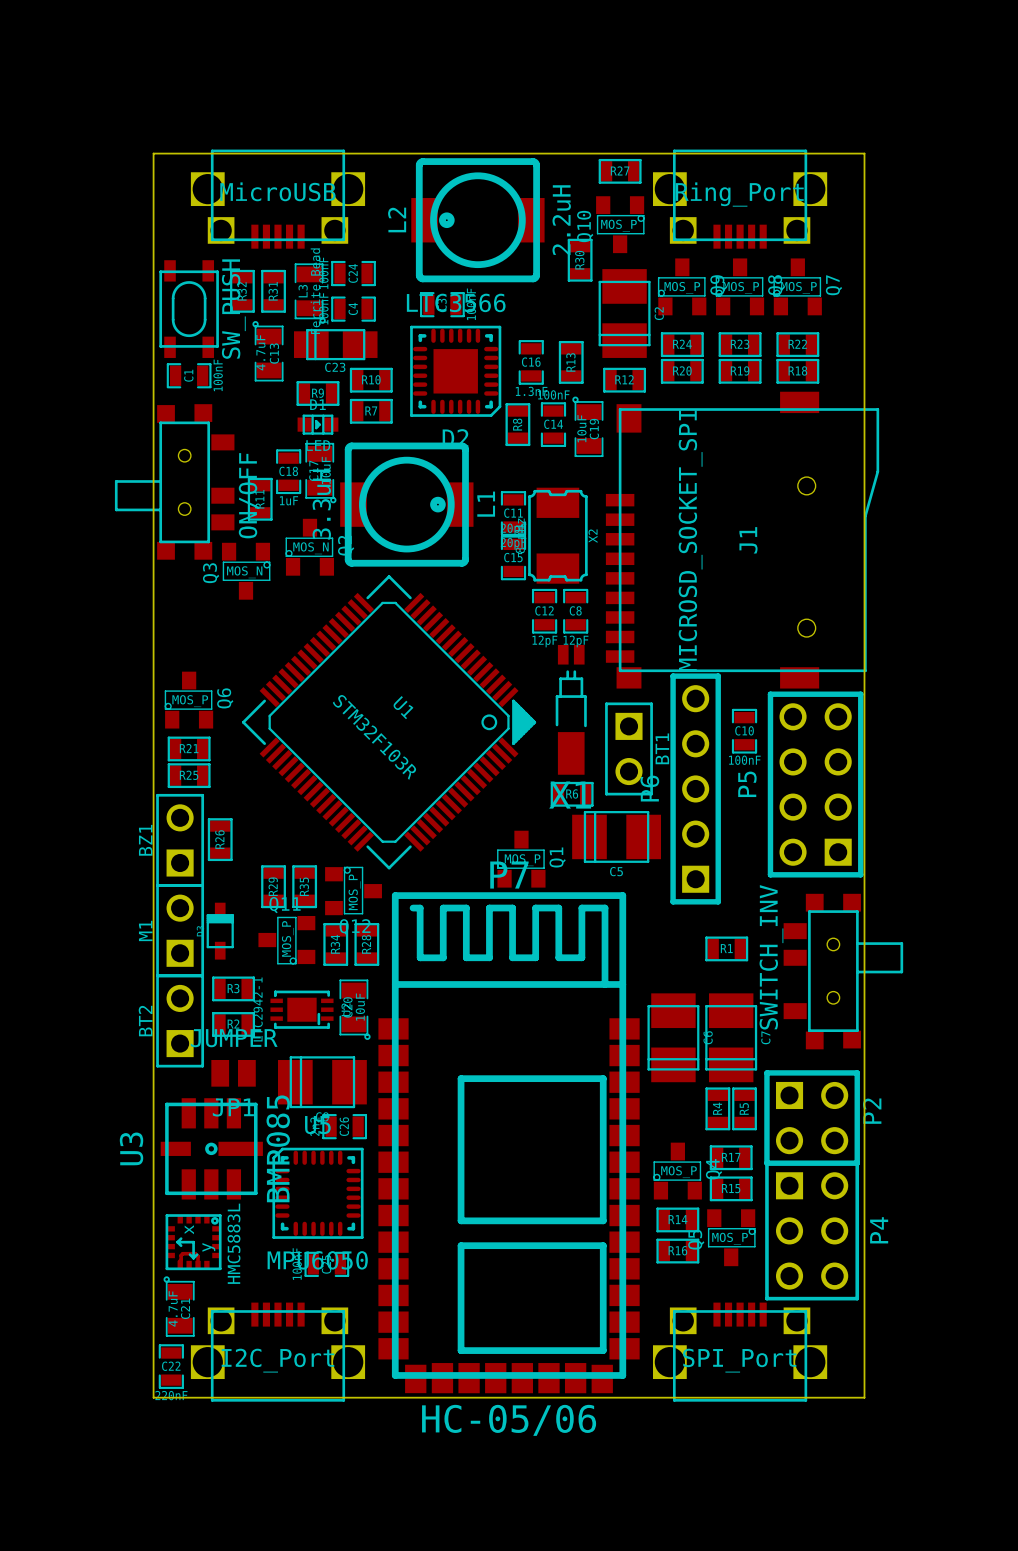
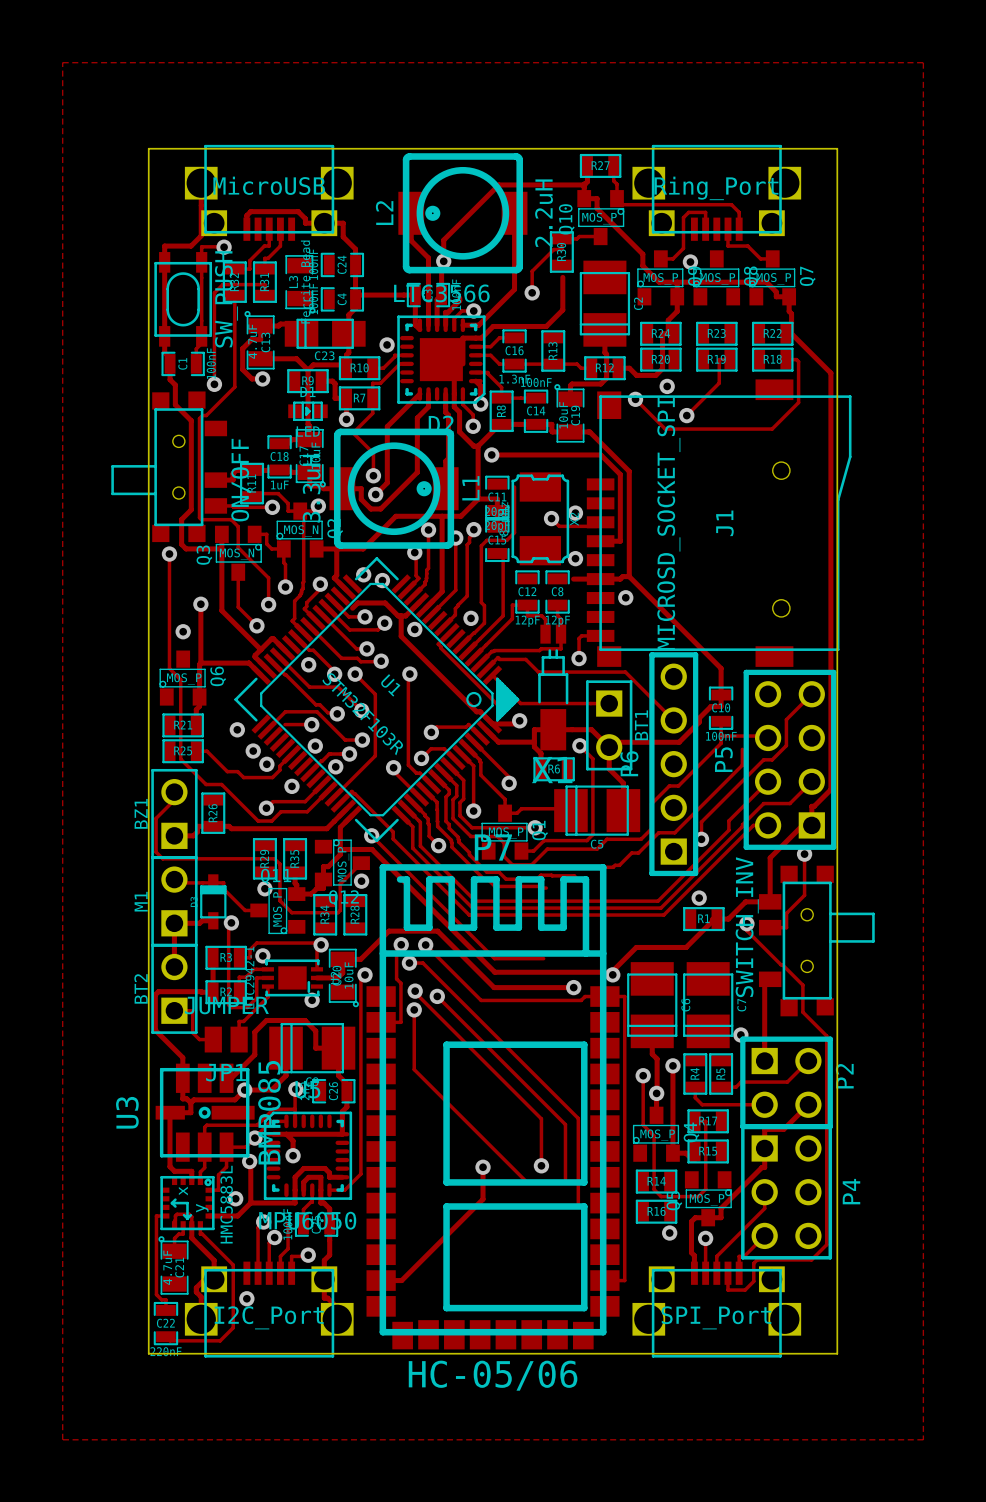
zone outline: none -> (62, 62) (923, 62) (923, 1439) (62, 1439) (62, 62)
track: none -> (587, 165) (587, 181) (584, 184) (584, 198) (597, 198) (597, 208) (642, 254) (642, 265) (659, 282) (766, 282) (776, 291) (776, 296) (789, 296) (791, 333)
track: none -> (613, 165) (617, 198) (623, 204) (731, 204) (739, 212) (739, 229)
track: none -> (201, 183) (201, 235) (191, 246) (164, 246) (164, 352) (170, 358) (170, 379) (175, 385) (175, 404) (191, 420) (191, 509) (181, 519) (181, 544) (186, 548) (221, 548)
track: none -> (584, 184) (498, 184) (443, 240) (441, 295) (437, 299) (437, 325)
track: none -> (411, 213) (411, 240) (428, 258) (428, 325)
track: none -> (514, 213) (514, 289) (478, 325) (462, 325)
track: none -> (246, 229) (246, 215) (250, 211) (298, 211) (305, 218) (305, 223) (343, 223) (343, 236) (355, 249) (355, 308) (348, 314) (348, 352) (346, 355) (346, 368)
track: none -> (269, 229) (269, 246) (264, 246) (249, 260) (249, 269) (234, 269)
track: none -> (280, 229) (280, 246) (268, 258) (264, 258) (264, 269)
track: none -> (705, 229) (705, 212) (688, 212) (683, 217) (683, 248) (672, 258) (660, 258)
track: none -> (727, 229) (727, 246) (747, 246) (760, 258) (772, 258)
track: none -> (600, 236) (561, 238) (561, 249) (553, 249) (532, 271) (532, 292)
track: none -> (224, 247) (201, 246) (201, 343) (196, 348) (196, 363)
via: none -> (224, 247)
via: none -> (443, 261)
via: none -> (690, 262)
track: none -> (562, 277) (562, 309) (546, 326) (493, 326) (481, 338) (462, 338) (462, 363)
track: none -> (677, 282) (677, 311) (668, 320) (668, 333)
via: none -> (532, 292)
track: none -> (234, 295) (234, 387) (206, 415) (202, 415) (199, 418) (199, 517) (201, 519) (231, 519) (238, 526) (238, 547) (268, 578) (268, 604)
track: none -> (264, 295) (264, 284) (222, 284) (214, 292) (214, 384)
track: none -> (355, 295) (415, 295) (415, 325) (419, 329)
track: none -> (459, 298) (459, 300) (448, 312) (445, 312) (445, 325)
track: none -> (473, 310) (462, 310) (454, 318) (454, 325)
via: none -> (473, 310)
track: none -> (604, 329) (606, 378) (600, 384) (572, 384) (570, 399)
track: none -> (301, 333) (301, 326) (299, 324) (260, 326) (260, 339) (251, 339) (242, 348) (242, 369) (252, 378) (262, 378)
track: none -> (673, 333) (662, 333) (662, 368) (655, 375) (636, 375) (629, 368) (606, 368)
track: none -> (791, 333) (830, 373) (830, 789) (814, 806) (811, 806) (811, 825)
track: none -> (514, 337) (499, 337) (490, 346) (475, 346)
via: none -> (387, 344)
track: none -> (406, 355) (394, 355) (383, 368) (372, 368)
track: none -> (437, 355) (441, 359) (450, 359) (454, 363) (454, 406) (459, 412) (459, 431) (473, 446) (478, 446)
track: none -> (475, 355) (490, 355) (499, 364) (577, 364) (581, 368) (591, 368)
track: none -> (260, 358) (296, 358) (308, 370)
track: none -> (729, 359) (719, 359) (719, 383) (686, 415)
track: none -> (785, 359) (796, 359) (798, 361) (798, 402) (772, 429) (665, 429) (635, 399)
track: none -> (406, 363) (399, 363) (380, 383) (372, 383) (372, 413) (353, 432) (373, 453) (373, 475)
track: none -> (346, 364) (313, 364) (308, 370)
track: none -> (308, 370) (309, 439) (291, 439) (287, 443) (279, 443)
track: none -> (475, 372) (487, 372) (501, 387) (501, 398) (536, 398)
via: none -> (262, 378)
track: none -> (321, 381) (332, 381) (335, 383) (335, 398) (346, 398) (346, 419)
track: none -> (475, 381) (480, 386) (480, 403)
via: none -> (214, 384)
via: none -> (667, 386)
track: none -> (419, 394) (387, 426) (387, 482) (375, 494)
track: none -> (428, 394) (428, 406) (417, 418) (417, 472) (380, 508) (370, 508) (361, 499) (361, 488) (323, 488) (320, 486) (309, 486) (309, 472) (291, 472) (289, 469) (236, 470) (233, 473) (233, 480) (215, 480)
track: none -> (445, 394) (445, 412) (448, 415) (448, 458) (445, 461) (445, 488)
track: none -> (462, 394) (462, 404) (473, 414) (473, 426)
via: none -> (635, 399)
via: none -> (480, 403)
via: none -> (686, 415)
via: none -> (346, 419)
via: none -> (473, 426)
track: none -> (478, 446) (478, 498)
track: none -> (478, 446) (499, 424) (551, 424) (552, 431) (589, 431) (629, 471) (629, 576)
track: none -> (491, 454) (600, 454) (620, 474) (620, 541) (600, 541)
via: none -> (491, 454)
via: none -> (373, 475)
track: none -> (514, 487) (514, 532) (506, 540) (486, 540) (481, 545) (481, 602) (484, 605) (484, 623) (462, 644)
via: none -> (375, 494)
track: none -> (252, 496) (255, 493) (278, 493) (288, 503) (288, 511) (313, 511) (318, 506)
track: none -> (215, 505) (272, 507)
via: none -> (318, 506)
via: none -> (272, 507)
track: none -> (303, 511) (303, 581) (301, 592)
via: none -> (575, 513)
track: none -> (442, 516) (442, 591) (425, 608)
track: none -> (551, 518) (559, 526) (596, 526) (600, 522)
via: none -> (551, 518)
track: none -> (497, 527) (497, 499) (478, 499) (460, 516) (395, 516) (363, 548) (316, 548)
track: none -> (473, 529) (473, 533) (469, 537) (467, 544) (467, 596) (455, 608) (455, 614) (443, 626)
via: none -> (473, 529)
track: none -> (428, 529) (428, 568) (426, 580) (413, 596)
via: none -> (428, 529)
track: none -> (221, 534) (221, 610) (260, 649)
track: none -> (254, 534) (266, 534) (266, 543) (271, 548) (283, 548) (285, 587)
track: none -> (455, 538) (455, 590) (431, 614)
via: none -> (455, 538)
track: none -> (336, 548) (336, 575) (334, 577) (346, 590)
track: none -> (414, 552) (416, 575) (418, 578) (407, 590)
via: none -> (414, 552)
track: none -> (503, 553) (503, 615) (468, 650)
track: none -> (169, 554) (169, 668) (180, 679) (180, 759) (206, 784) (221, 784) (258, 821) (271, 821) (281, 811) (307, 811) (328, 790)
via: none -> (169, 554)
via: none -> (575, 558)
track: none -> (238, 572) (238, 607) (256, 625)
via: none -> (363, 574)
track: none -> (629, 576) (622, 576) (620, 579) (573, 579)
track: none -> (629, 576) (721, 668) (721, 706) (711, 706) (699, 718) (699, 722) (679, 742) (614, 742) (609, 747)
via: none -> (382, 580)
track: none -> (320, 584) (320, 589) (306, 602) (304, 608) (315, 620)
via: none -> (320, 584)
via: none -> (285, 587)
track: none -> (301, 592) (294, 601) (294, 618) (292, 621) (303, 632)
via: none -> (625, 597)
track: none -> (334, 602) (348, 616) (364, 616)
track: none -> (419, 602) (405, 615) (398, 615) (385, 602) (357, 602) (352, 608)
track: none -> (200, 604) (200, 663)
via: none -> (200, 604)
via: none -> (268, 604)
track: none -> (557, 605) (557, 615) (561, 619) (561, 648) (494, 650) (480, 663)
track: none -> (328, 608) (349, 629) (377, 629) (384, 623)
track: none -> (322, 614) (356, 648) (366, 648)
track: none -> (401, 615) (401, 636) (476, 711) (480, 711) (492, 723) (516, 723) (519, 720)
via: none -> (364, 616)
via: none -> (471, 618)
via: none -> (384, 623)
via: none -> (256, 625)
track: none -> (309, 626) (341, 658) (357, 658) (360, 661) (381, 661)
via: none -> (414, 629)
via: none -> (183, 631)
track: none -> (449, 632) (438, 644) (499, 706)
track: none -> (545, 634) (545, 619) (541, 615) (527, 615) (527, 605) (512, 605) (512, 618) (474, 656)
track: none -> (600, 635) (581, 635) (579, 638) (579, 658)
track: none -> (297, 638) (309, 650) (313, 650) (334, 671) (334, 674)
via: none -> (366, 648)
track: none -> (285, 650) (271, 638) (255, 655) (267, 669)
track: none -> (279, 656) (309, 687) (338, 687) (361, 710)
via: none -> (579, 658)
via: none -> (381, 661)
track: none -> (200, 663) (199, 706) (196, 709) (196, 725)
track: none -> (200, 663) (249, 663) (261, 675)
track: none -> (273, 663) (316, 704) (319, 704) (327, 712) (337, 713)
via: none -> (308, 664)
track: none -> (486, 669) (497, 657) (499, 659) (525, 659) (538, 672) (625, 672) (673, 720)
track: none -> (409, 674) (408, 765) (431, 784)
via: none -> (409, 674)
via: none -> (334, 674)
track: none -> (355, 674) (375, 694) (375, 755) (334, 796)
via: none -> (355, 674)
track: none -> (492, 675) (520, 703) (609, 703)
track: none -> (811, 694) (786, 719) (786, 745) (772, 759) (763, 759) (701, 822) (701, 839)
via: none -> (361, 710)
via: none -> (337, 713)
via: none -> (519, 720)
track: none -> (721, 721) (721, 743) (678, 786) (669, 786) (651, 803) (651, 828) (641, 839) (606, 839) (597, 849) (547, 849) (531, 864) (512, 864) (504, 856) (504, 843) (497, 836) (470, 836) (453, 818) (453, 799) (456, 796) (456, 785) (443, 772)
track: none -> (285, 724) (306, 724)
via: none -> (311, 724)
via: none -> (237, 729)
track: none -> (267, 730) (285, 711) (317, 711) (345, 740) (362, 740)
track: none -> (486, 730) (498, 742) (534, 742)
track: none -> (431, 732) (436, 727) (466, 727) (468, 724) (480, 736)
via: none -> (431, 732)
track: none -> (721, 736) (766, 736) (768, 737)
via: none -> (362, 740)
track: none -> (474, 742) (509, 777) (509, 783)
via: none -> (315, 746)
track: none -> (579, 745) (592, 758) (592, 834) (586, 840) (544, 840) (533, 851) (521, 851)
via: none -> (579, 745)
track: none -> (609, 747) (591, 729) (534, 729) (534, 746) (541, 753) (541, 769)
track: none -> (609, 747) (609, 768) (623, 783) (623, 810)
track: none -> (468, 748) (479, 759) (480, 775) (505, 799) (505, 813) (517, 813) (521, 808) (569, 808) (570, 810)
track: none -> (742, 749) (742, 765) (674, 832) (658, 832) (638, 853) (631, 853) (619, 865) (605, 867)
track: none -> (196, 751) (206, 751) (227, 771) (237, 771) (243, 777) (272, 777) (279, 770) (279, 766) (291, 754)
via: none -> (253, 751)
track: none -> (349, 754) (329, 754) (309, 772)
via: none -> (349, 754)
track: none -> (462, 754) (473, 765) (473, 811)
track: none -> (421, 758) (431, 748) (444, 748) (455, 760)
via: none -> (421, 758)
via: none -> (266, 764)
via: none -> (335, 766)
track: none -> (449, 766) (463, 780) (463, 798) (460, 802) (460, 815) (472, 827) (535, 827)
track: none -> (393, 767) (393, 771) (419, 796)
via: none -> (393, 767)
track: none -> (437, 778) (449, 790) (449, 793) (445, 796) (445, 821) (449, 824) (449, 828) (458, 837) (458, 842) (469, 854) (486, 872) (499, 872) (506, 879) (536, 879) (540, 875) (574, 875) (576, 877)
track: none -> (768, 781) (728, 820) (728, 830) (658, 901) (475, 901) (420, 846) (420, 822) (407, 809)
track: none -> (811, 781) (789, 803) (763, 803) (660, 908) (472, 908) (412, 848) (412, 826) (401, 815)
via: none -> (509, 783)
track: none -> (322, 784) (305, 801) (272, 801) (266, 808)
via: none -> (291, 786)
track: none -> (425, 790) (437, 802) (437, 821)
track: none -> (174, 792) (174, 800) (156, 818) (156, 852) (162, 858) (274, 858) (279, 864) (279, 900) (291, 912) (337, 912) (340, 910) (340, 884) (361, 863)
track: none -> (340, 803) (351, 791) (355, 793) (393, 831) (393, 838) (469, 915) (663, 915) (753, 825) (768, 825)
track: none -> (413, 803) (428, 819) (429, 836) (438, 845)
via: none -> (266, 808)
track: none -> (346, 809) (326, 828) (231, 828) (229, 826) (197, 826) (197, 831) (193, 835) (174, 835)
via: none -> (473, 811)
track: none -> (352, 815) (340, 827) (340, 854) (328, 866) (323, 866) (323, 888) (316, 888) (311, 894) (296, 894) (295, 871)
track: none -> (811, 816) (770, 857) (770, 901) (745, 901) (728, 919) (712, 919) (686, 947) (636, 947) (612, 971) (612, 974)
track: none -> (437, 821) (437, 826) (451, 840) (452, 847) (484, 879) (488, 879) (494, 886) (546, 888)
via: none -> (535, 827)
track: none -> (371, 835) (494, 958) (543, 958)
via: none -> (371, 835)
via: none -> (701, 839)
via: none -> (438, 845)
track: none -> (340, 849) (372, 849) (494, 972) (612, 972)
track: none -> (804, 854) (804, 895) (786, 913) (786, 927) (770, 927)
via: none -> (804, 854)
track: none -> (174, 879) (177, 882) (223, 882) (223, 889) (245, 910) (258, 910)
via: none -> (361, 881)
via: none -> (264, 888)
via: none -> (699, 898)
track: none -> (213, 920) (202, 920) (199, 923) (174, 923) (174, 967)
track: none -> (231, 922) (228, 925) (228, 1004) (231, 1007) (247, 1007) (256, 998) (256, 977) (267, 977)
via: none -> (231, 922)
track: none -> (746, 923) (746, 930) (802, 985) (802, 1012) (826, 1036) (826, 1244) (811, 1259) (757, 1259) (753, 1263) (753, 1281) (745, 1290) (727, 1290) (727, 1273)
via: none -> (746, 923)
track: none -> (317, 944) (317, 969)
track: none -> (317, 944) (315, 943) (256, 943) (249, 949) (249, 957) (239, 957)
via: none -> (321, 944)
track: none -> (401, 944) (396, 949) (396, 978) (400, 983) (400, 1022) (381, 1022)
via: none -> (401, 944)
track: none -> (425, 944) (481, 1000) (581, 1000) (585, 996) (624, 996) (624, 1280) (604, 1280)
via: none -> (425, 944)
via: none -> (262, 955)
track: none -> (213, 957) (213, 992) (158, 991) (155, 994) (155, 1030) (182, 1057) (182, 1098) (186, 1098) (190, 1102)
track: none -> (409, 963) (422, 963) (578, 1118) (578, 1203)
via: none -> (409, 963)
track: none -> (267, 969) (253, 969) (246, 977) (239, 977) (239, 992)
track: none -> (365, 974) (360, 979) (360, 1174) (344, 1190) (329, 1190)
via: none -> (365, 974)
via: none -> (612, 974)
track: none -> (317, 977) (337, 977) (342, 972) (342, 959) (360, 959) (388, 931) (437, 931) (494, 987) (573, 987)
track: none -> (764, 979) (764, 1061)
track: none -> (267, 986) (267, 997) (243, 1021) (239, 1021) (239, 1039)
via: none -> (573, 987)
track: none -> (415, 991) (541, 1118) (541, 1165)
via: none -> (415, 991)
track: none -> (437, 996) (565, 1124) (565, 1178)
via: none -> (437, 996)
via: none -> (312, 1000)
track: none -> (414, 1009) (414, 1069) (526, 1181)
via: none -> (414, 1009)
track: none -> (174, 1010) (192, 1010) (192, 1032) (199, 1039) (213, 1039)
track: none -> (652, 1031) (652, 1054) (657, 1058) (656, 1115)
via: none -> (740, 1034)
track: none -> (286, 1048) (286, 1075) (271, 1090) (244, 1090) (234, 1099) (193, 1099) (190, 1102)
track: none -> (808, 1061) (787, 1082) (741, 1082) (736, 1087) (721, 1087)
track: none -> (672, 1065) (672, 1153) (685, 1153) (691, 1159) (695, 1159) (695, 1151)
via: none -> (672, 1065)
track: none -> (643, 1075) (643, 1125) (654, 1135) (654, 1189) (661, 1196) (698, 1196) (705, 1189) (705, 1121) (695, 1121)
via: none -> (643, 1075)
track: none -> (226, 1078) (231, 1078) (254, 1054) (254, 1032) (266, 1020) (305, 1020) (315, 1031) (315, 1048) (338, 1048) (338, 1075) (346, 1084) (346, 1107) (342, 1111) (342, 1134) (273, 1134)
track: none -> (695, 1087) (695, 1097) (702, 1104) (764, 1104)
track: none -> (295, 1089) (295, 1121)
via: none -> (295, 1089)
via: none -> (244, 1090)
via: none -> (656, 1093)
track: none -> (190, 1102) (190, 1112) (169, 1113) (169, 1166) (174, 1171) (191, 1171) (191, 1181)
track: none -> (808, 1104) (783, 1129) (764, 1129) (764, 1167) (761, 1167) (721, 1208) (721, 1217) (695, 1217) (691, 1221) (691, 1252) (694, 1255) (694, 1273)
track: none -> (295, 1109) (273, 1109) (257, 1125) (206, 1125) (204, 1127) (204, 1167) (200, 1172) (200, 1181)
track: none -> (286, 1121) (271, 1121) (245, 1147) (226, 1147) (226, 1166) (218, 1175) (218, 1190) (209, 1190)
track: none -> (286, 1134) (293, 1140) (293, 1155)
via: none -> (254, 1138)
via: none -> (293, 1155)
track: none -> (249, 1161) (250, 1202) (237, 1216) (209, 1216)
via: none -> (249, 1161)
via: none -> (541, 1165)
track: none -> (483, 1167) (483, 1199) (401, 1280) (381, 1280)
via: none -> (483, 1167)
track: none -> (342, 1177) (329, 1177) (329, 1173) (325, 1168) (303, 1168) (295, 1177) (295, 1203) (250, 1203)
track: none -> (303, 1190) (303, 1182) (308, 1177) (320, 1177) (320, 1203) (323, 1203) (329, 1208) (329, 1255) (324, 1260) (324, 1298) (327, 1298) (337, 1307) (337, 1319)
track: none -> (312, 1190) (312, 1202) (303, 1209) (303, 1224)
track: none -> (764, 1192) (764, 1208) (716, 1256) (716, 1273)
via: none -> (235, 1198)
track: none -> (165, 1216) (156, 1216) (156, 1294) (161, 1299) (165, 1299) (165, 1310)
track: none -> (263, 1221) (258, 1227) (258, 1273)
via: none -> (263, 1221)
track: none -> (286, 1223) (288, 1248) (280, 1256) (280, 1273)
track: none -> (183, 1225) (183, 1234) (178, 1234) (174, 1238) (174, 1251)
track: none -> (191, 1225) (191, 1238) (214, 1260) (214, 1279) (204, 1279) (196, 1287) (196, 1292) (201, 1296) (201, 1319)
track: none -> (200, 1225) (200, 1234) (233, 1265) (233, 1327) (220, 1340) (170, 1340) (165, 1336)
via: none -> (669, 1233)
track: none -> (764, 1235) (744, 1256) (739, 1256) (739, 1273)
track: none -> (274, 1237) (269, 1242) (269, 1273)
via: none -> (274, 1237)
track: none -> (705, 1238) (705, 1273)
via: none -> (705, 1238)
track: none -> (308, 1255) (291, 1256) (291, 1273)
via: none -> (308, 1255)
via: none -> (246, 1298)

